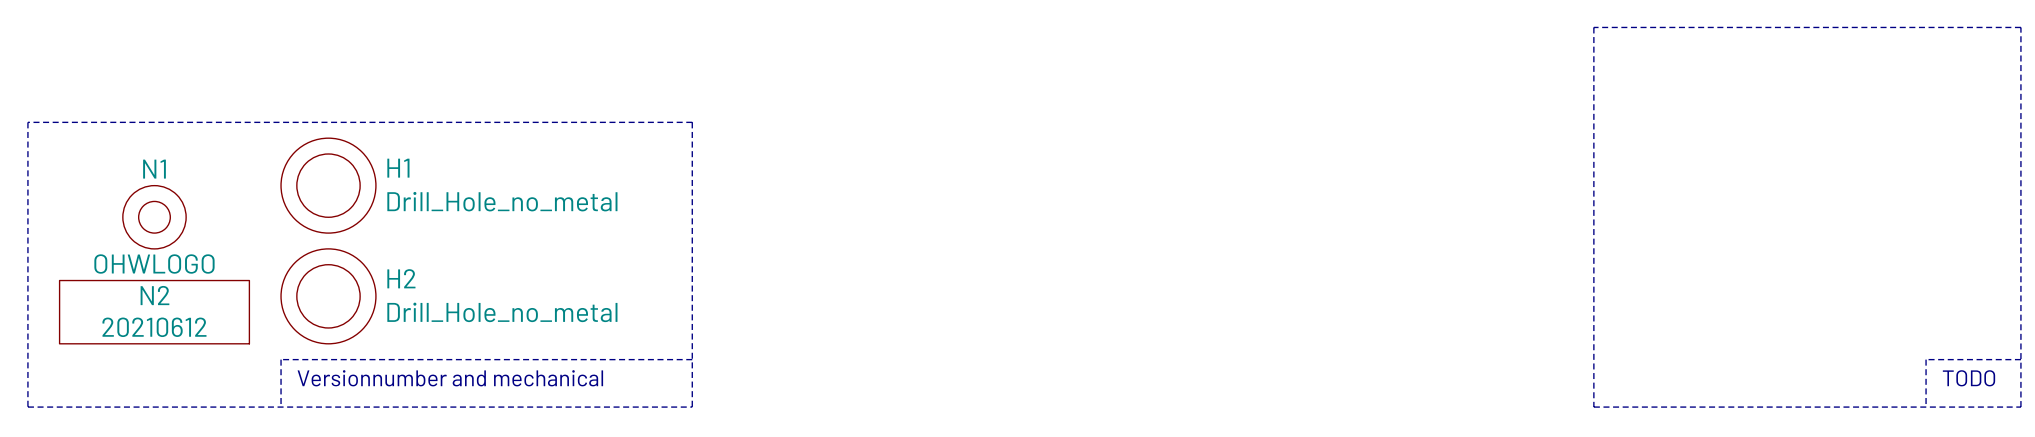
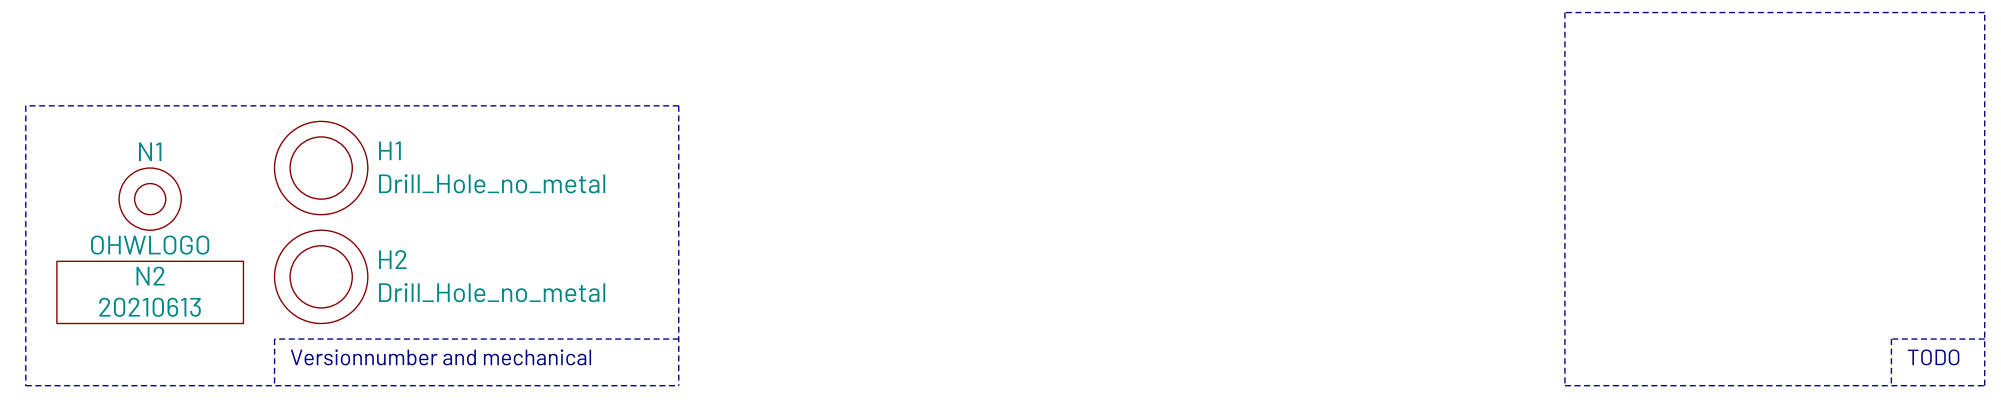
N2 value: 20210612 (154, 327) -> 20210613 (150, 307)

